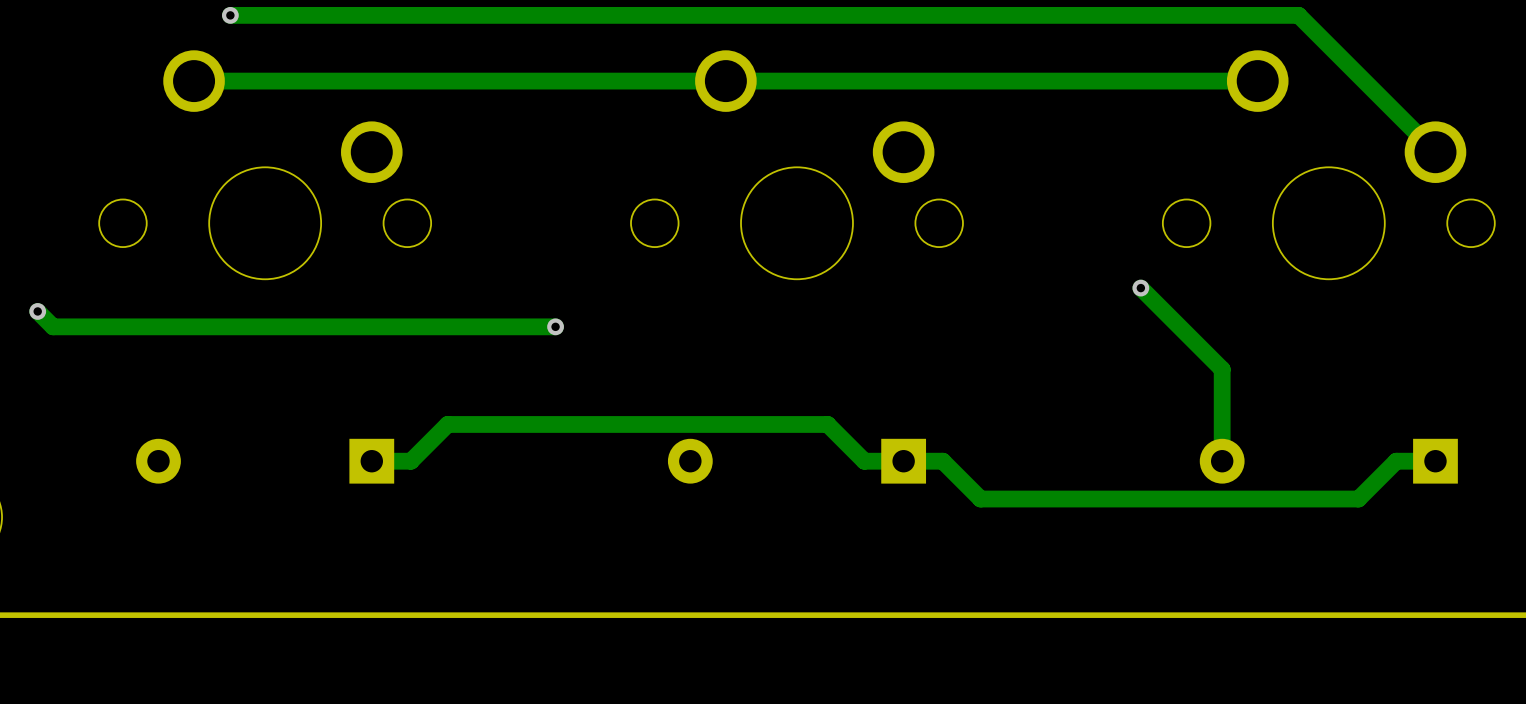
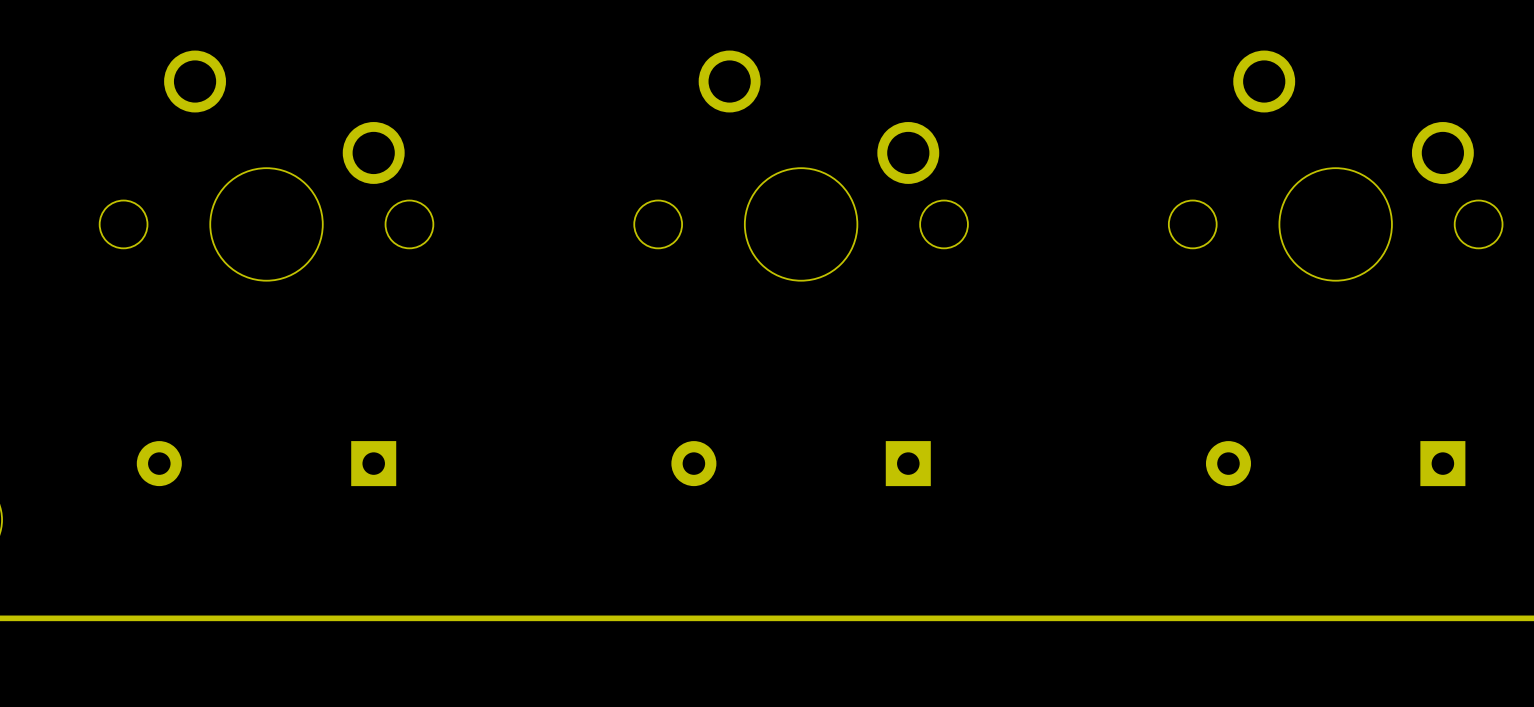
track: (230, 15) (1298, 15) (1435, 152) -> none
via: (230, 15) -> none
track: (1257, 81) (194, 81) -> none
track: (1140, 288) (1222, 369) (1222, 461) -> none
via: (1140, 288) -> none
track: (37, 311) (53, 326) (555, 326) -> none
via: (37, 311) -> none
via: (555, 326) -> none
track: (1435, 461) (1396, 461) (1358, 499) (980, 499) (942, 461) (864, 461) (827, 424) (447, 424) (410, 461) (371, 461) -> none

